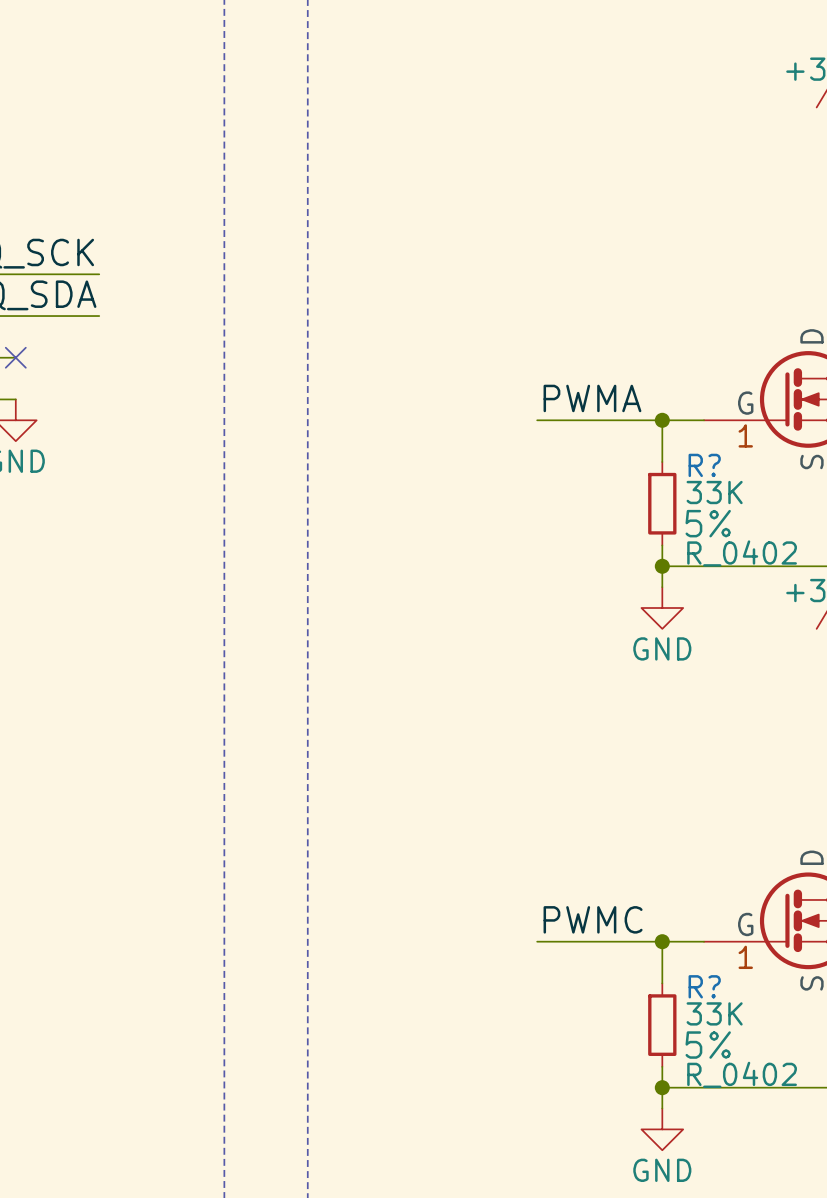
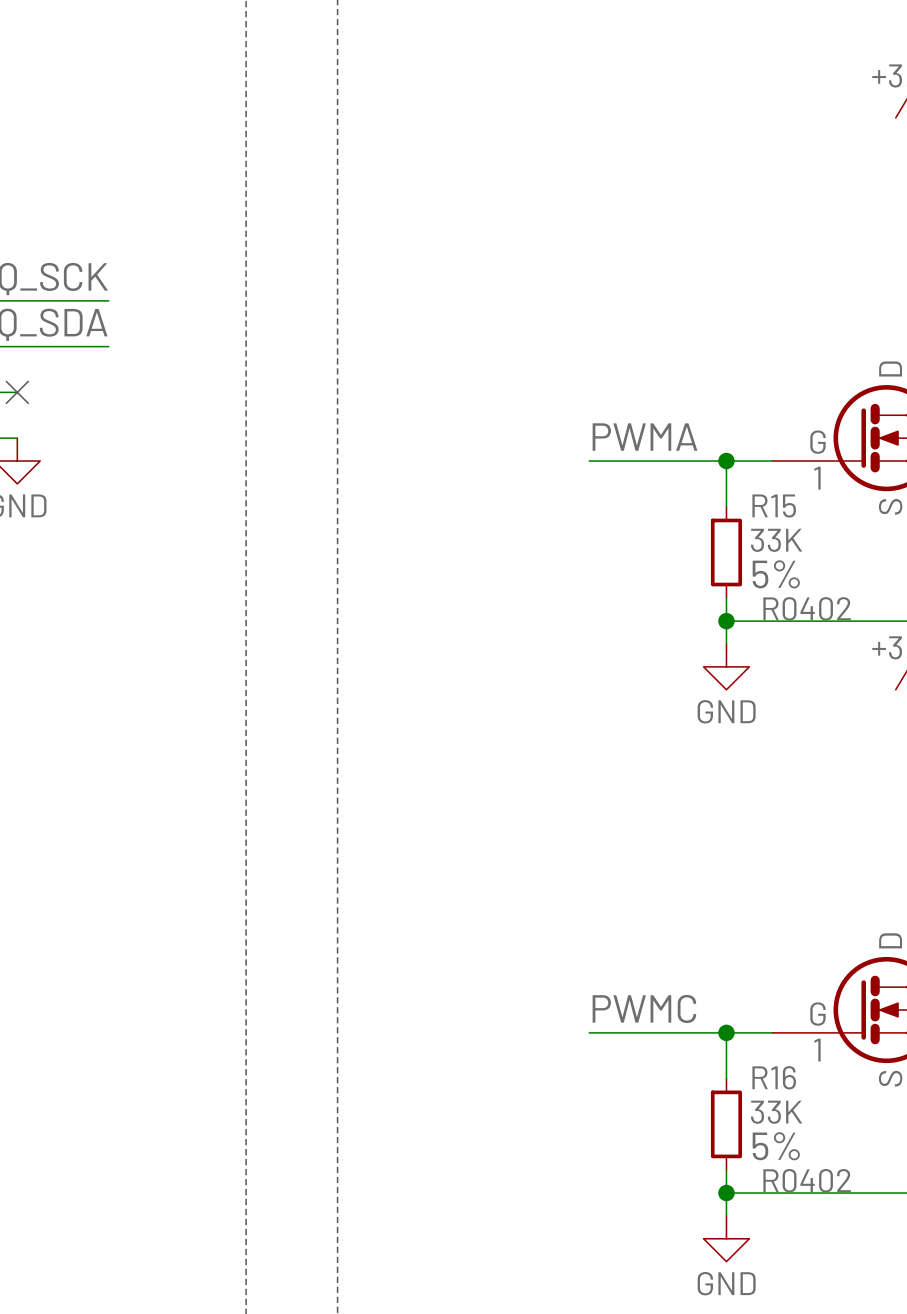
R? name: R? (704, 465) -> R15 (774, 506)
R? text: R_0402 (742, 553) -> R0402 (807, 608)
R? name: R? (704, 986) -> R16 (774, 1077)
R? text: R_0402 (742, 1074) -> R0402 (807, 1180)

